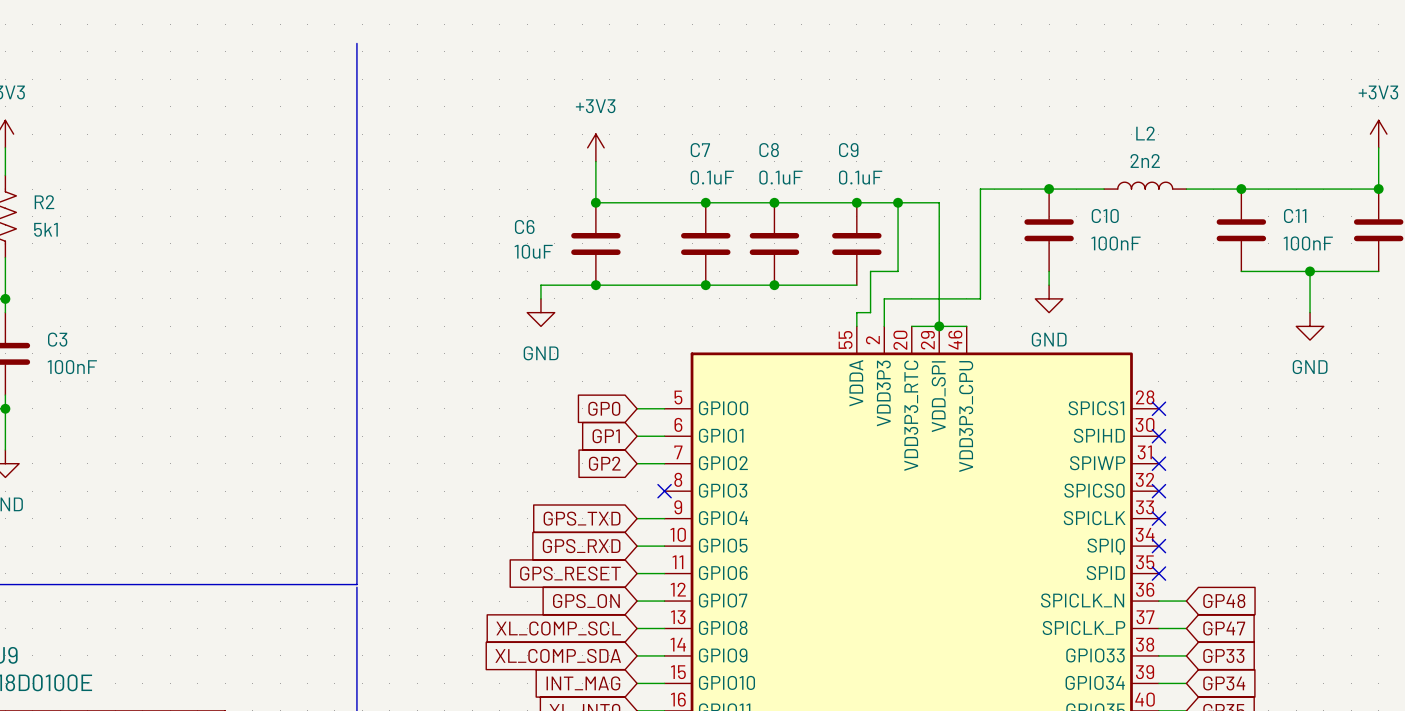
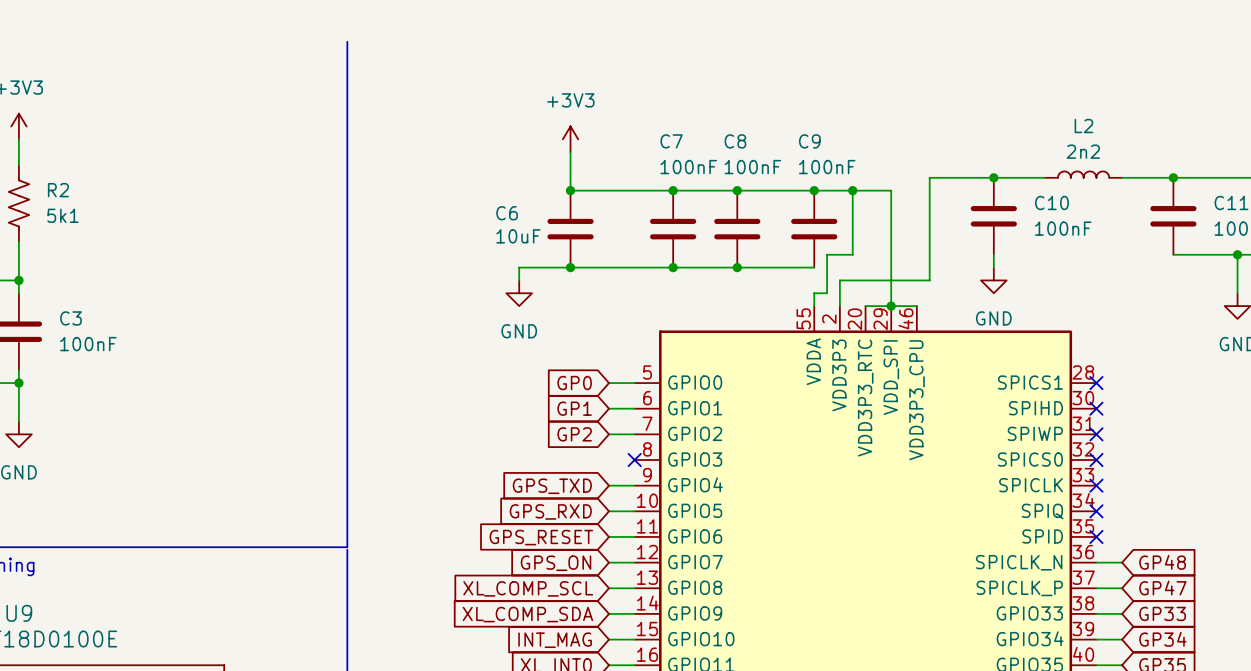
C7 value: 0.1uF (712, 177) -> 100nF (688, 167)
C8 value: 0.1uF (780, 177) -> 100nF (752, 167)
C9 value: 0.1uF (860, 177) -> 100nF (827, 167)

